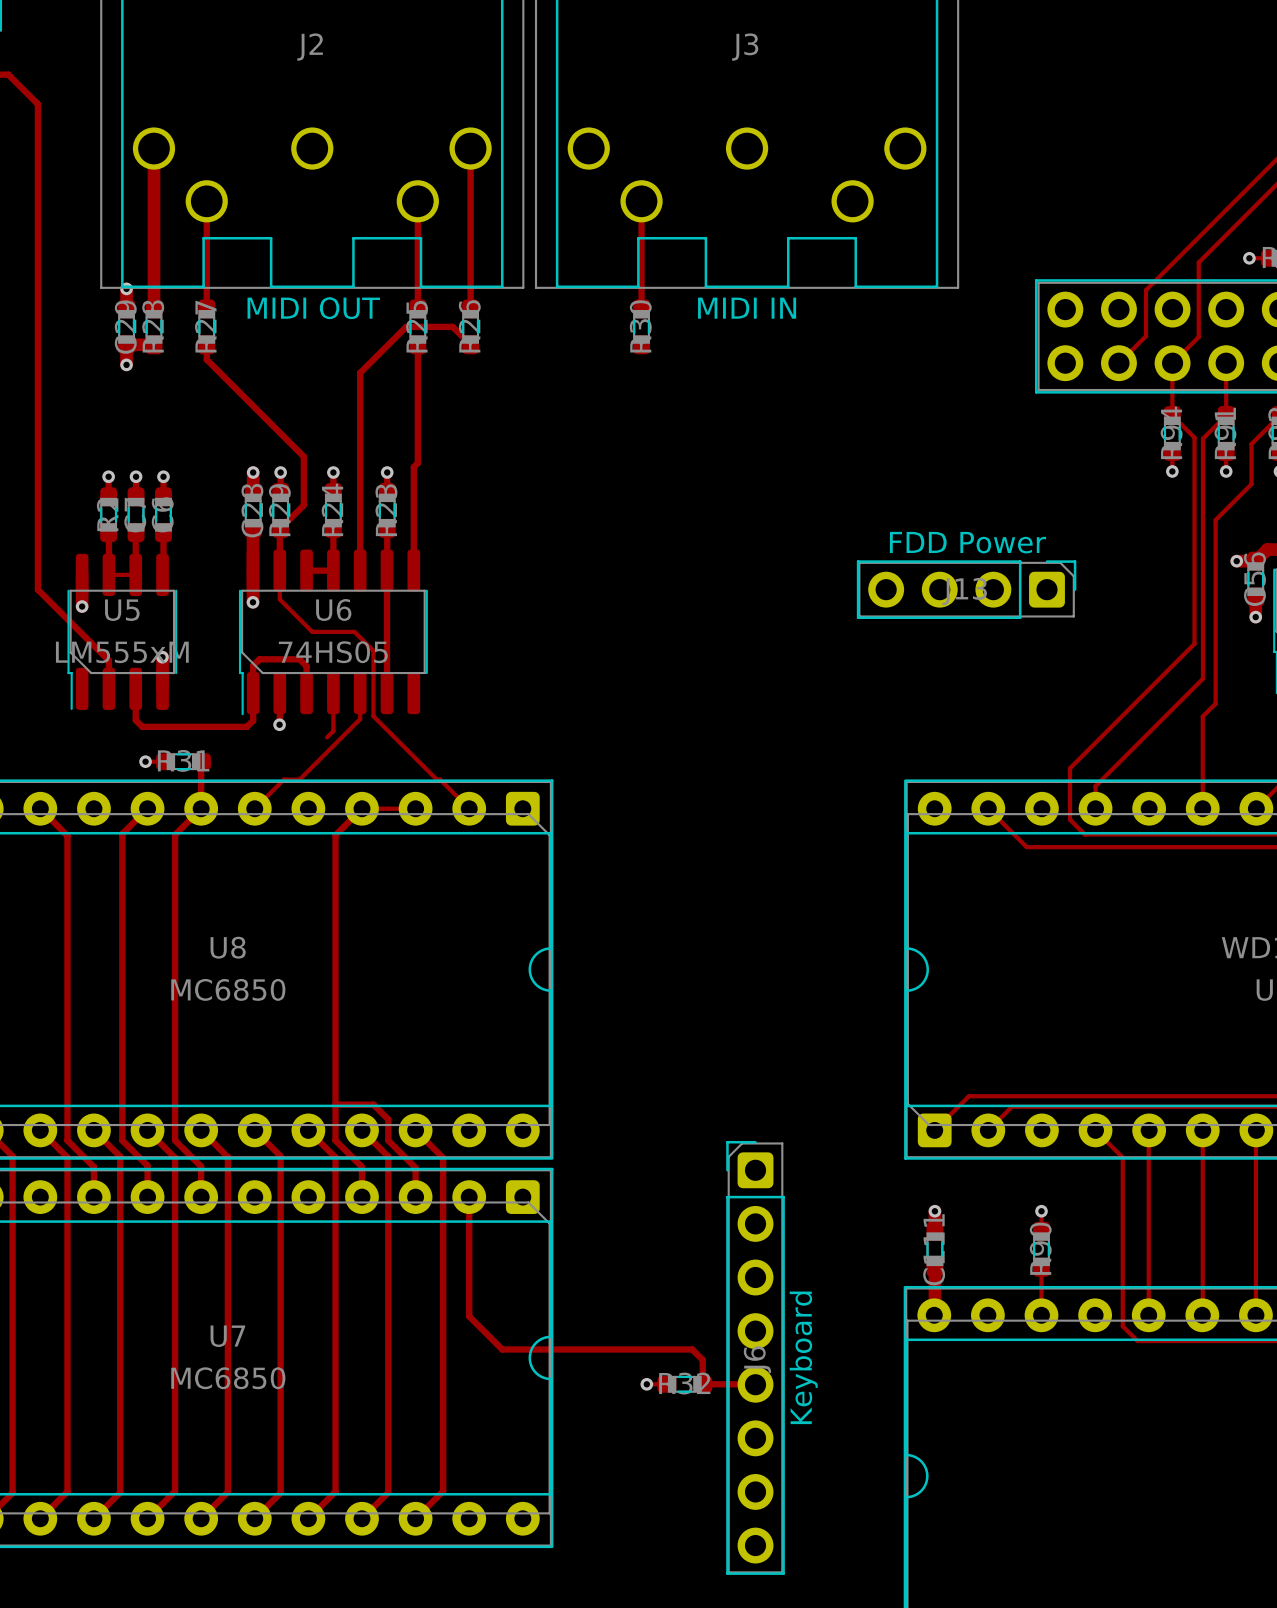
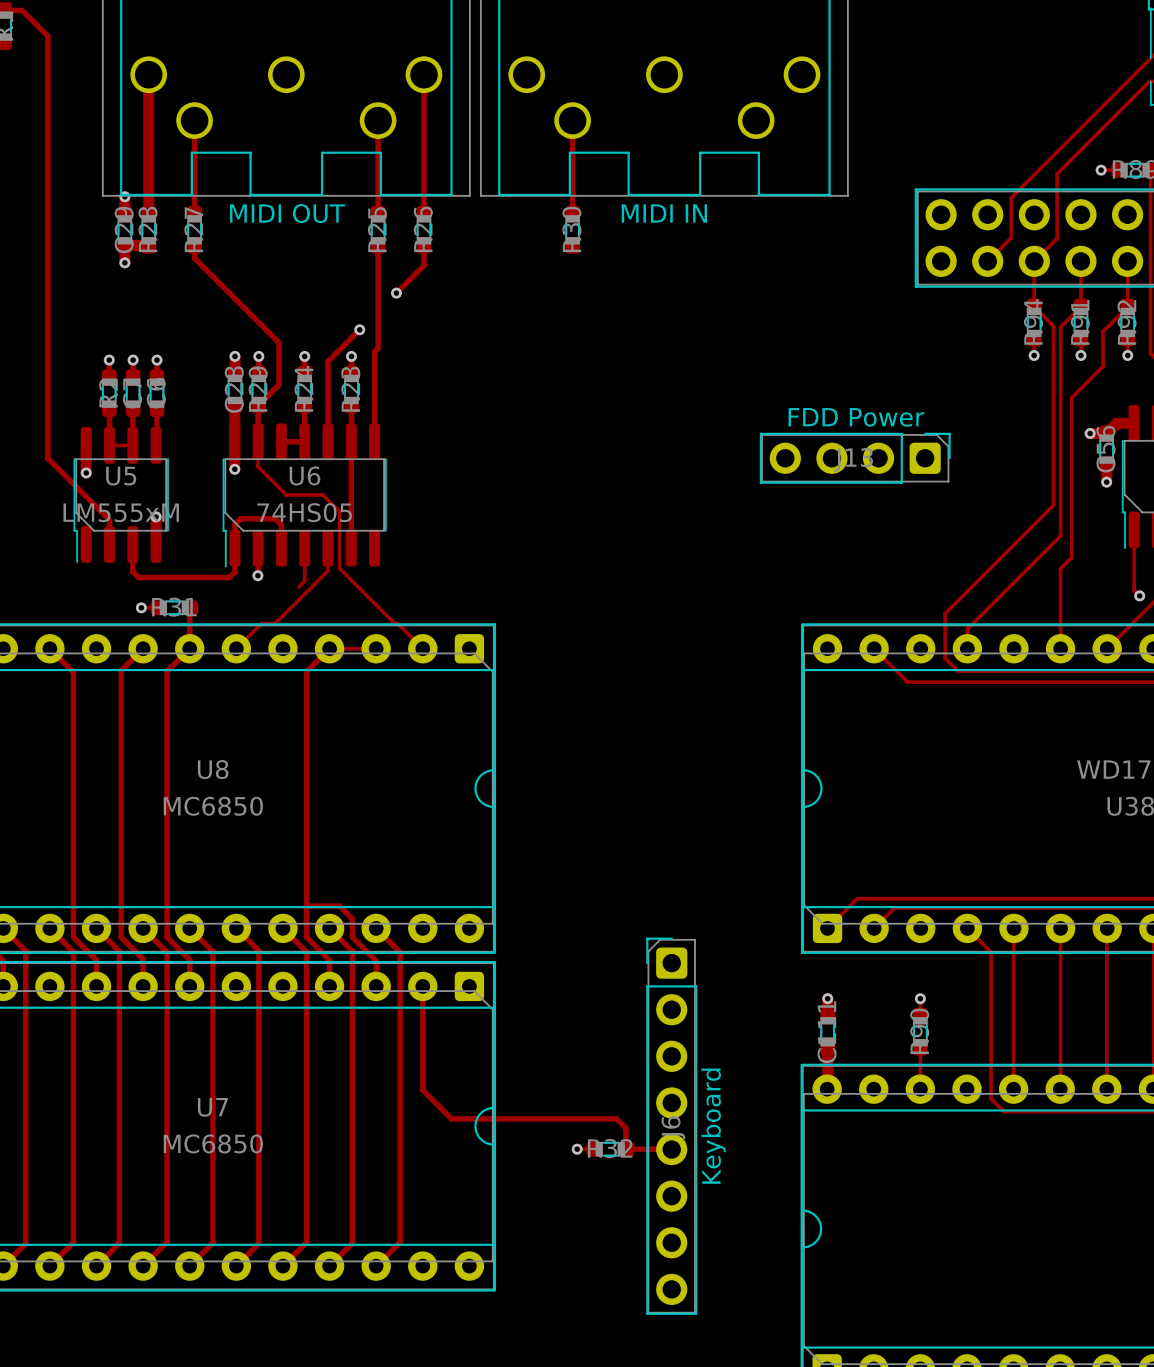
track: (470, 344) (452, 326) (406, 326) (360, 372) (360, 478) -> (423, 245) (423, 265) (396, 293)
via: none -> (396, 293)
track: none -> (359, 329) (328, 361)
via: none -> (359, 329)

